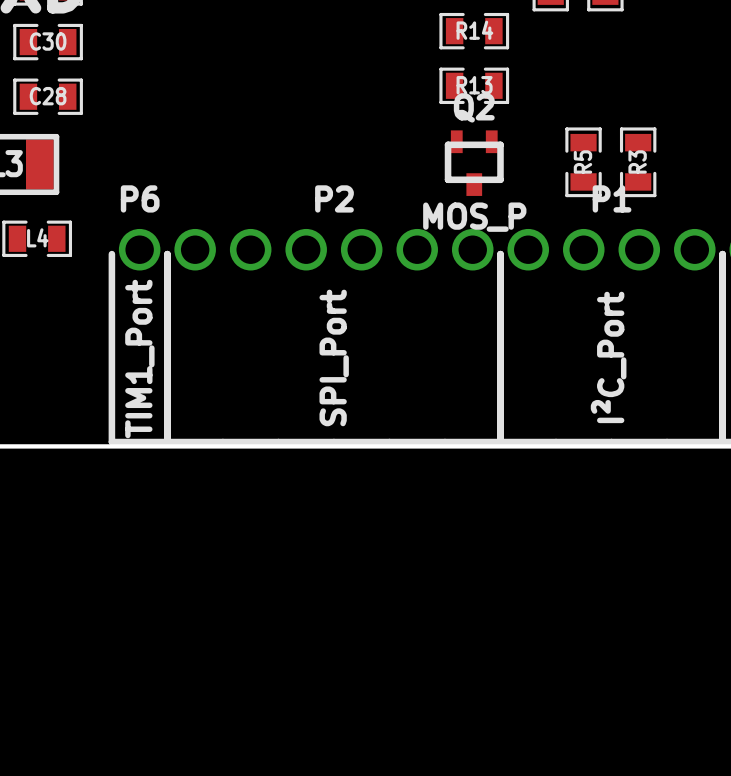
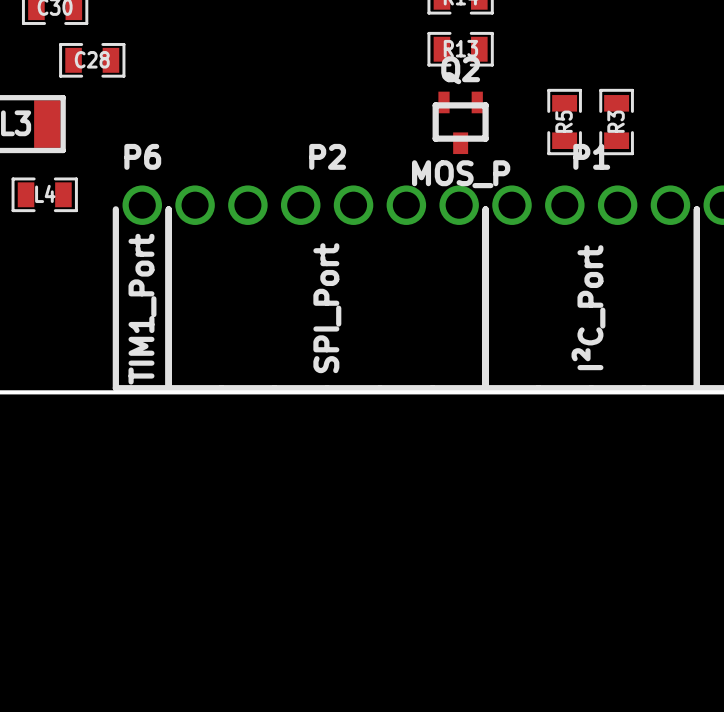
C28 position: (48, 96) -> (92, 60)

